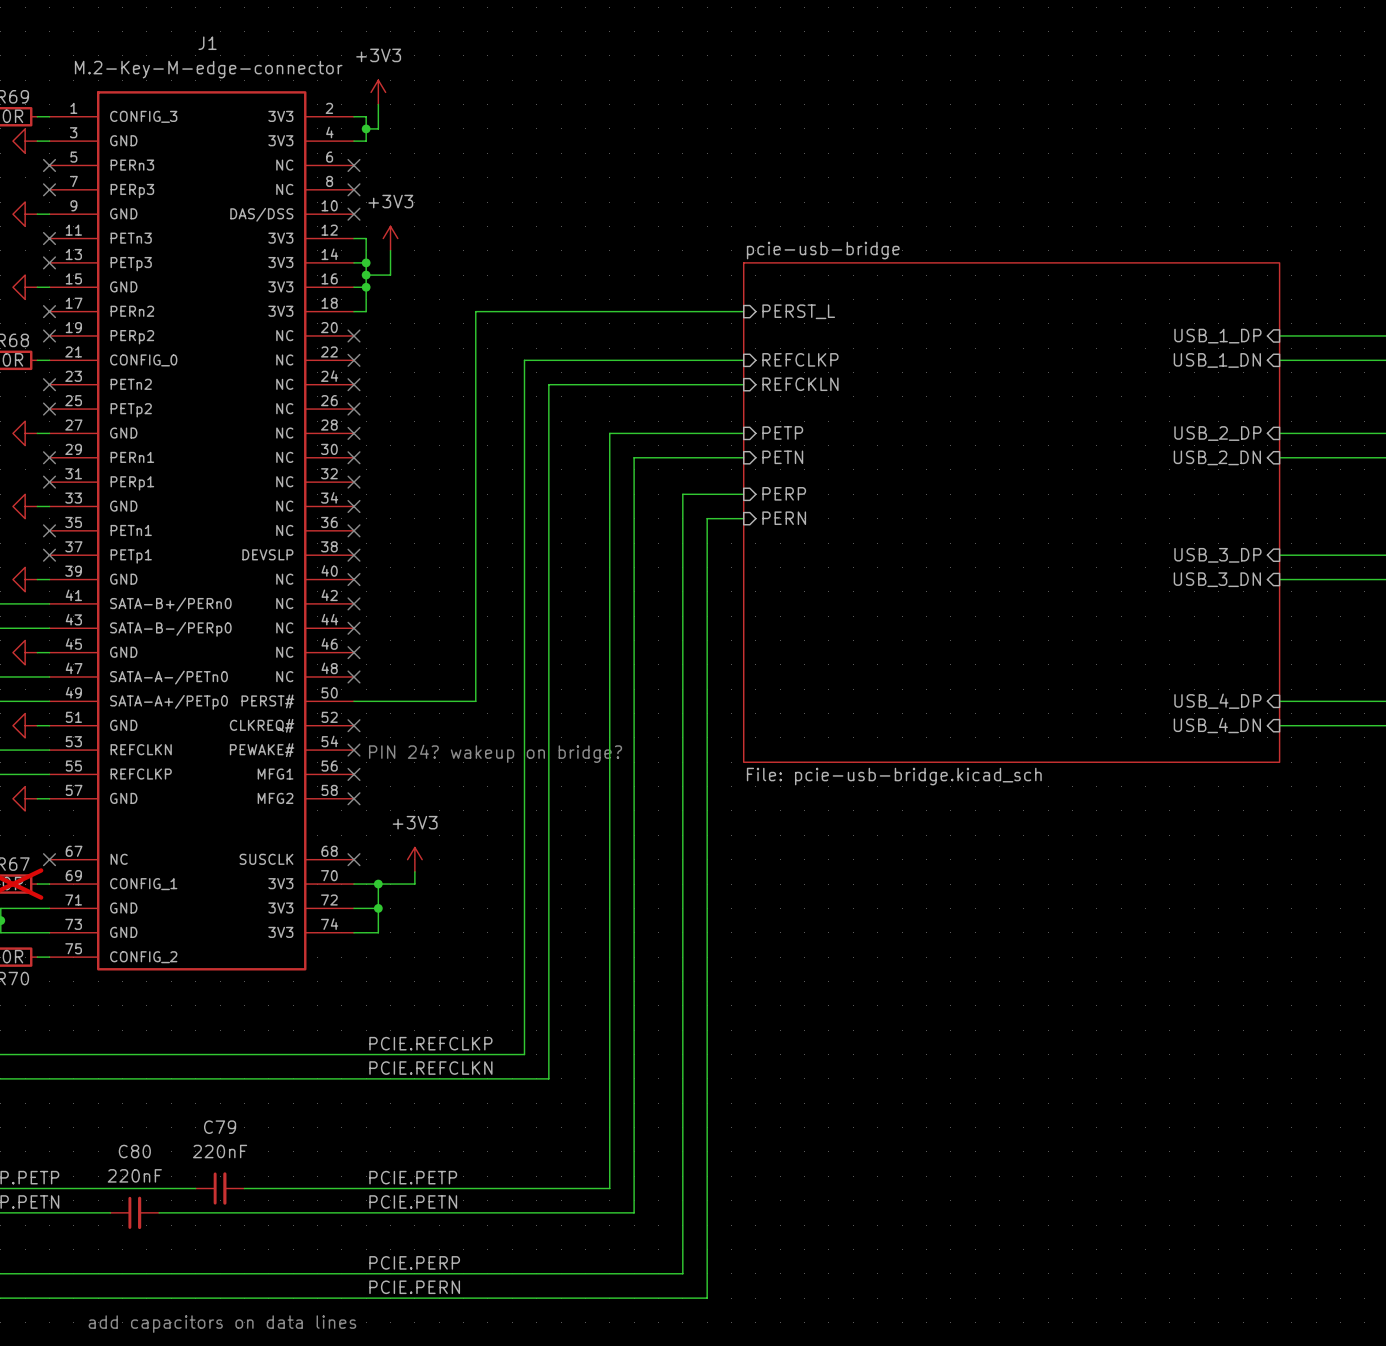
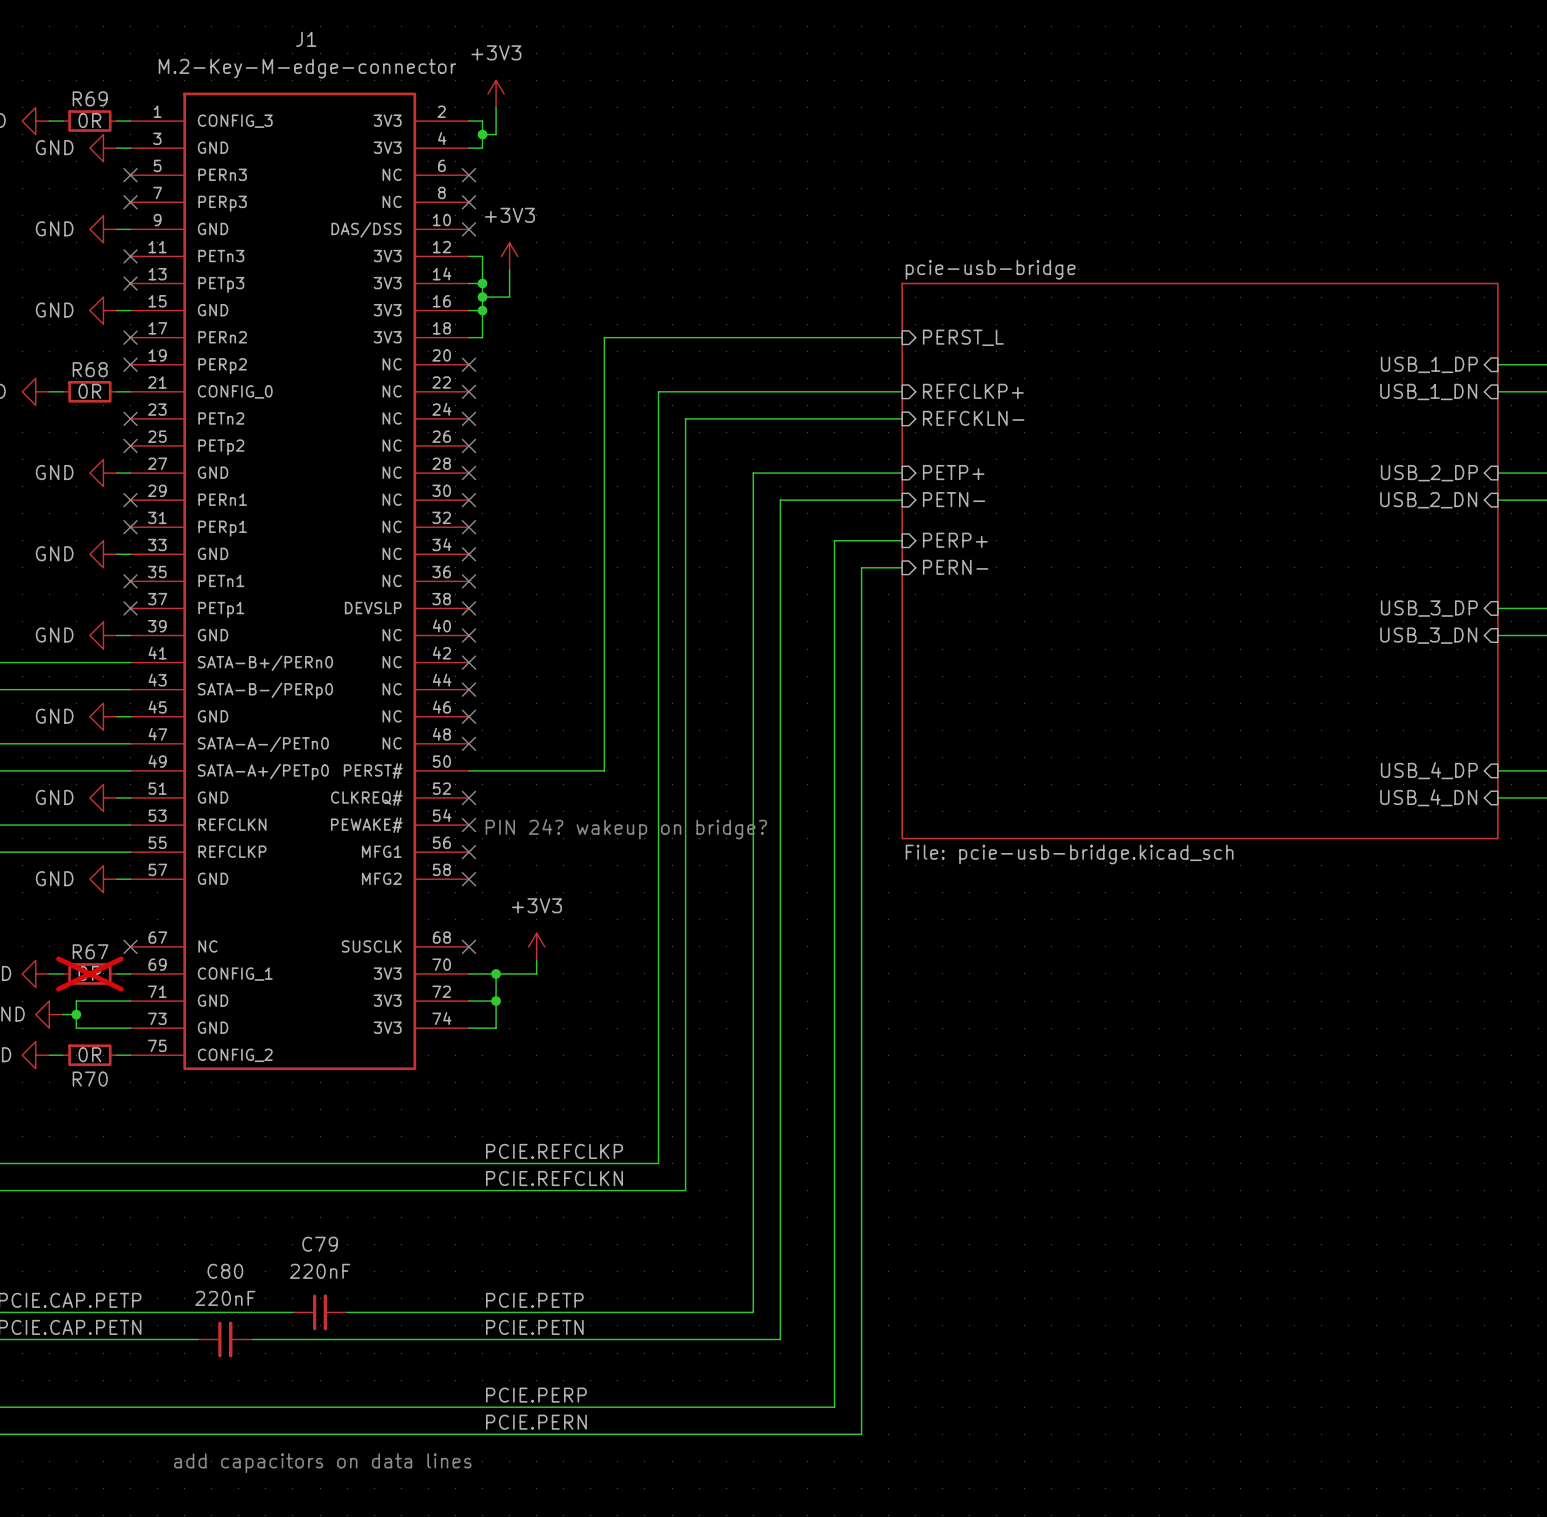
sheet pin: REFCLKP (800, 359) -> REFCLKP+ (973, 391)
sheet pin: REFCKLN (800, 384) -> REFCKLN- (973, 418)
sheet pin: PETP (782, 432) -> PETP+ (953, 472)
sheet pin: PETN (782, 457) -> PETN- (954, 499)
sheet pin: PERP (784, 493) -> PERP+ (955, 540)
sheet pin: PERN (784, 518) -> PERN- (955, 567)

